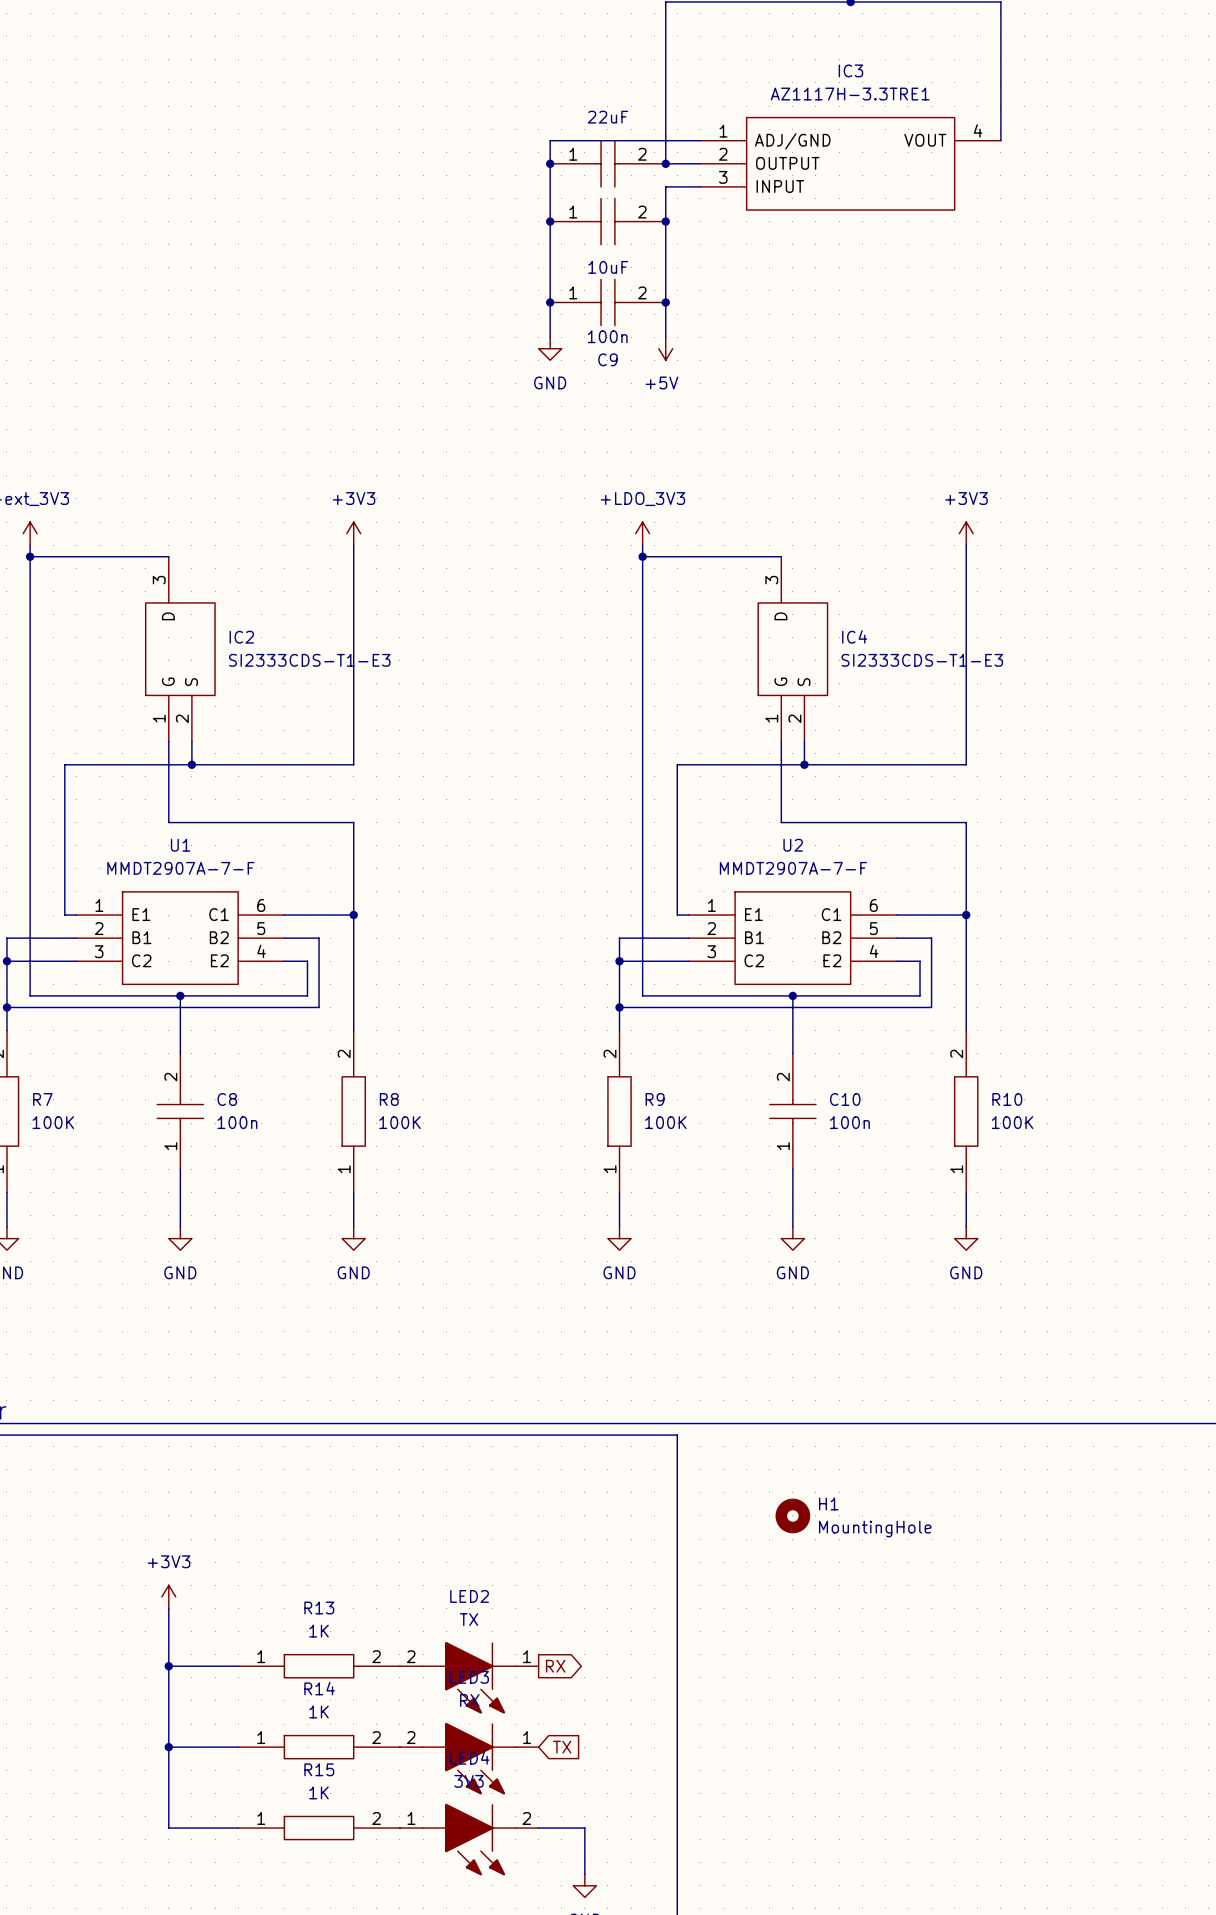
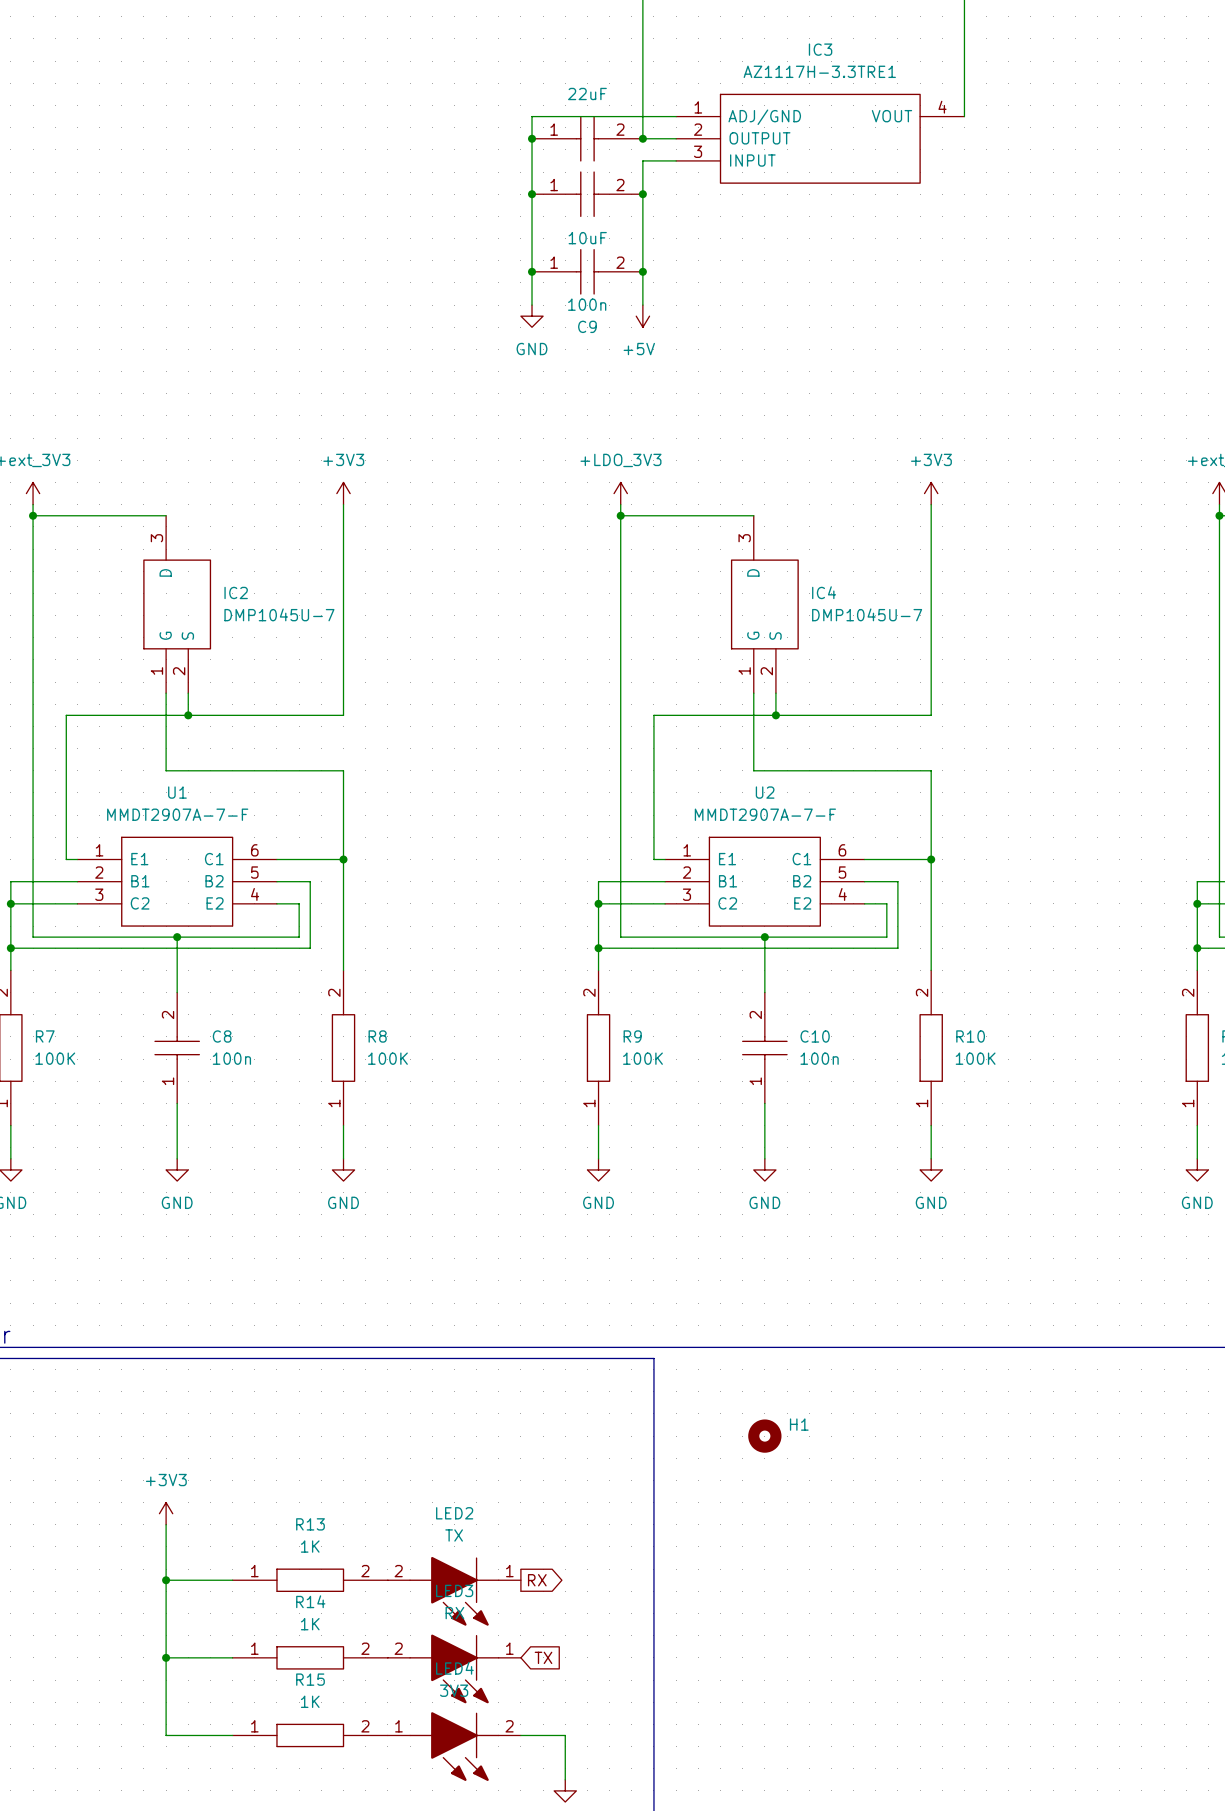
IC2 value: SI2333CDS-T1-E3 (309, 660) -> DMP1045U-7 (279, 614)
IC4 value: SI2333CDS-T1-E3 (922, 660) -> DMP1045U-7 (867, 614)
H1 value: MountingHole (875, 1529) -> none

